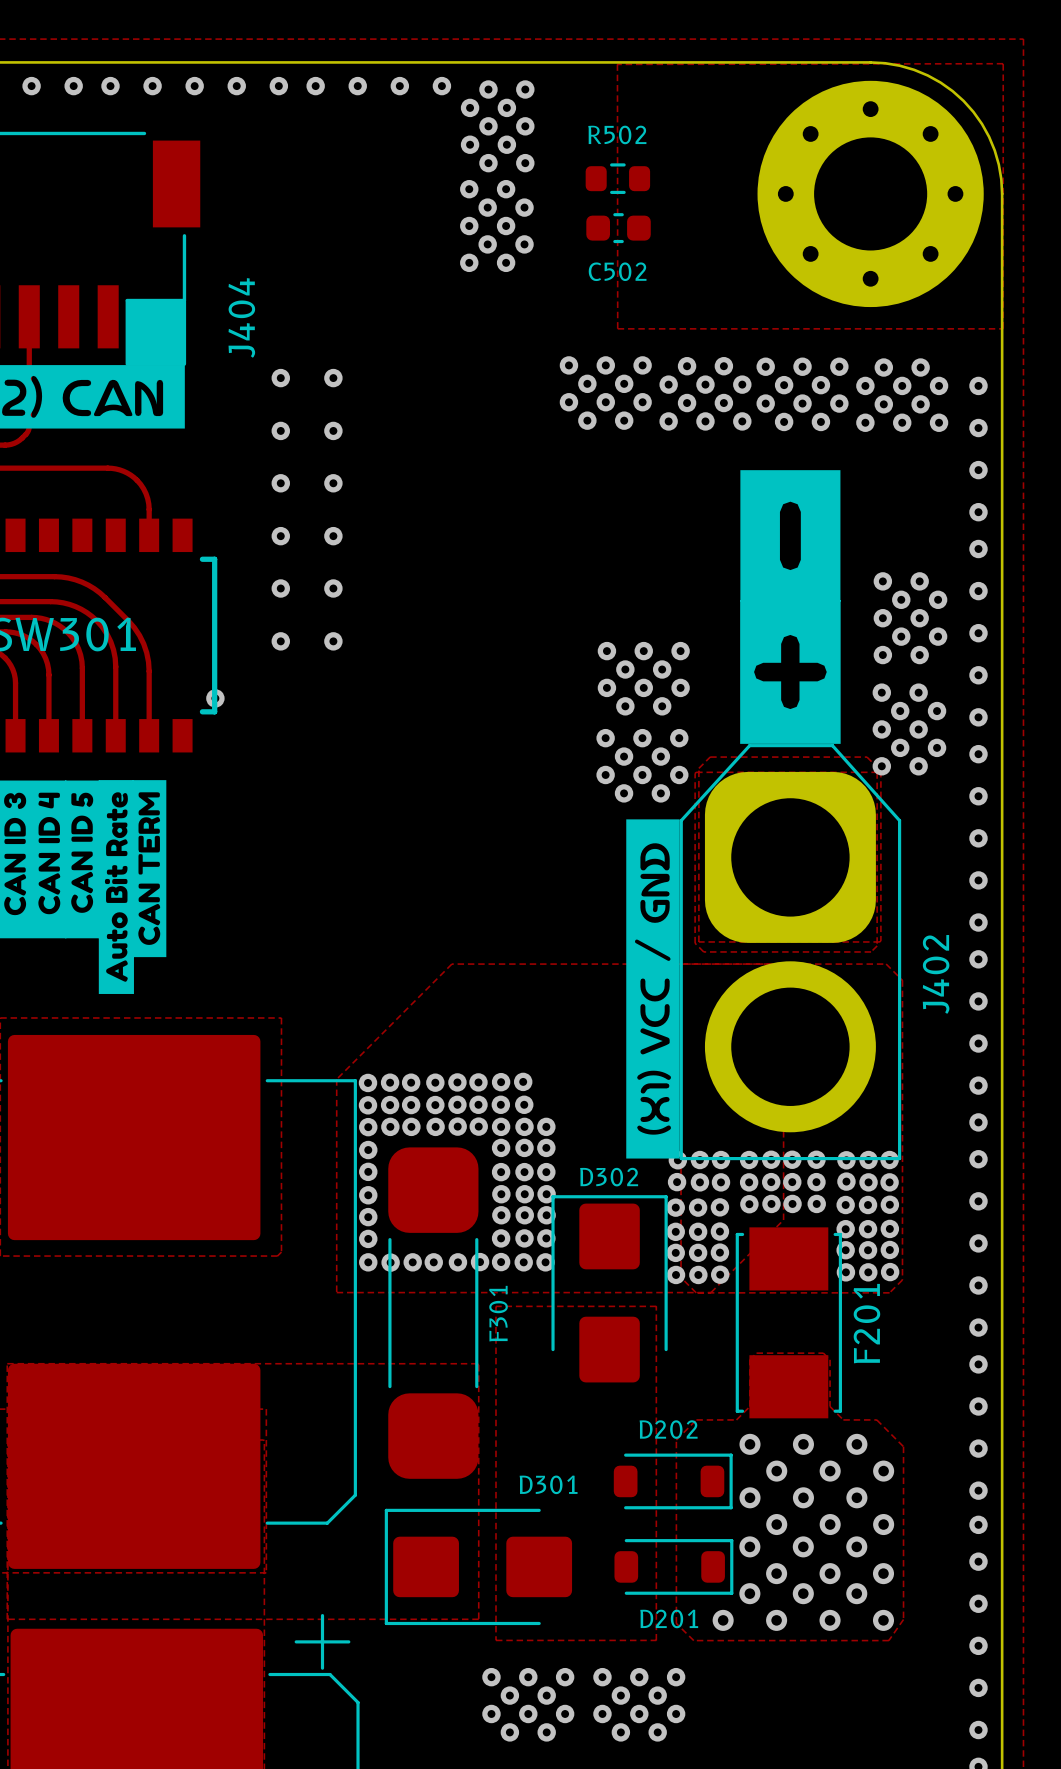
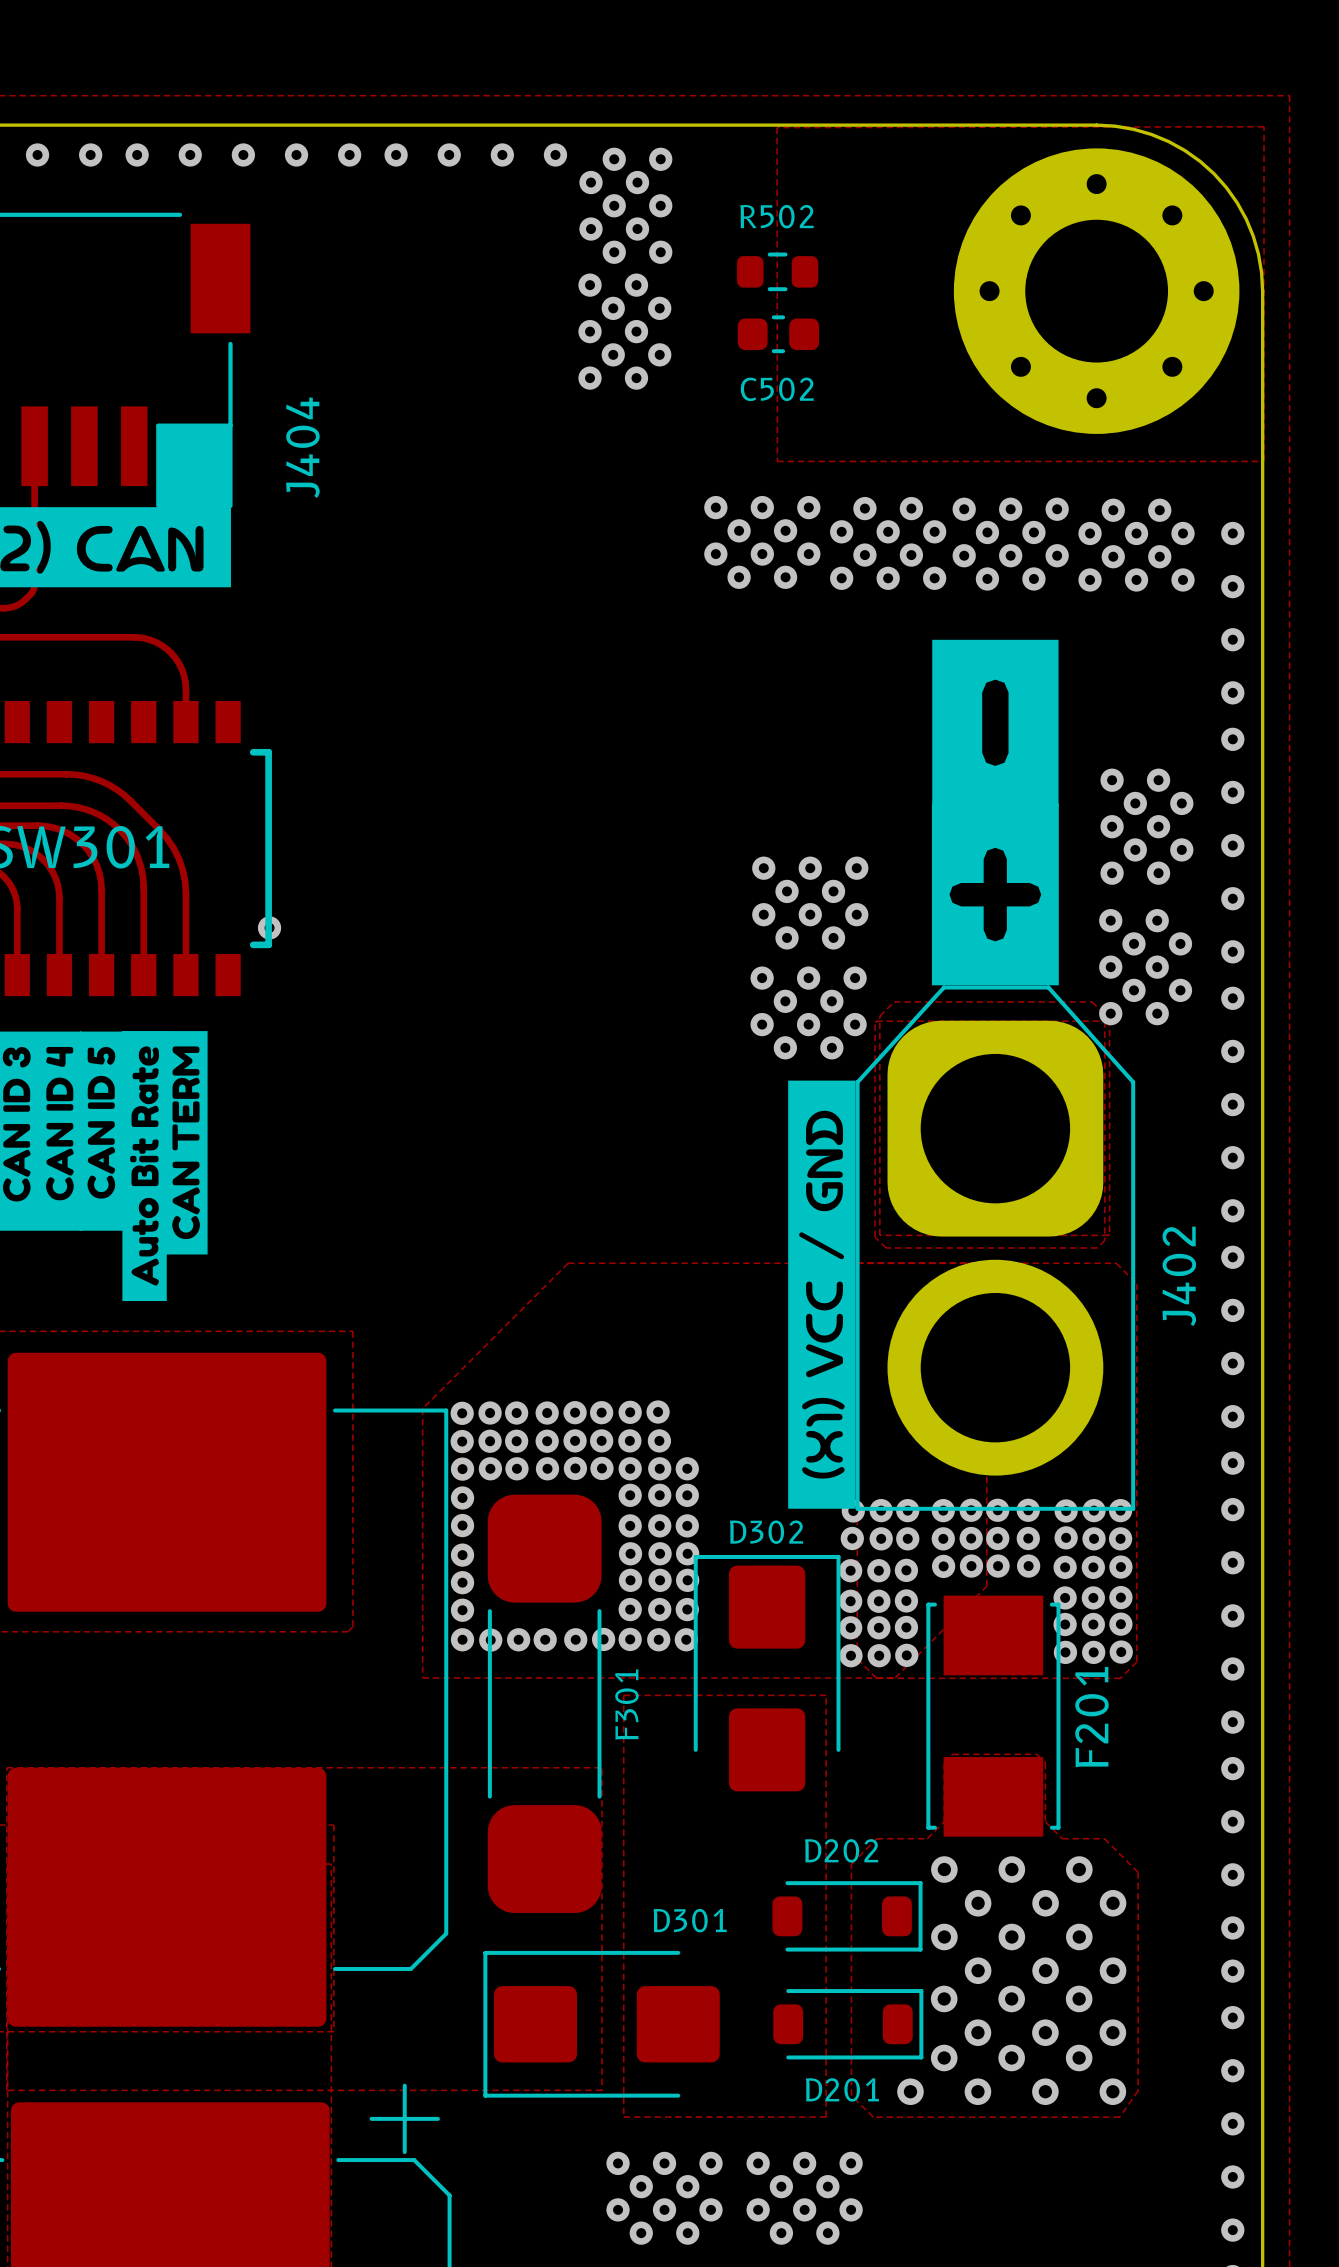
via: (280, 378) -> none
via: (333, 378) -> none
via: (280, 430) -> none
via: (333, 430) -> none
via: (280, 483) -> none
via: (333, 483) -> none
via: (280, 536) -> none
via: (333, 536) -> none
via: (280, 588) -> none
via: (333, 588) -> none
via: (280, 641) -> none
via: (333, 641) -> none

